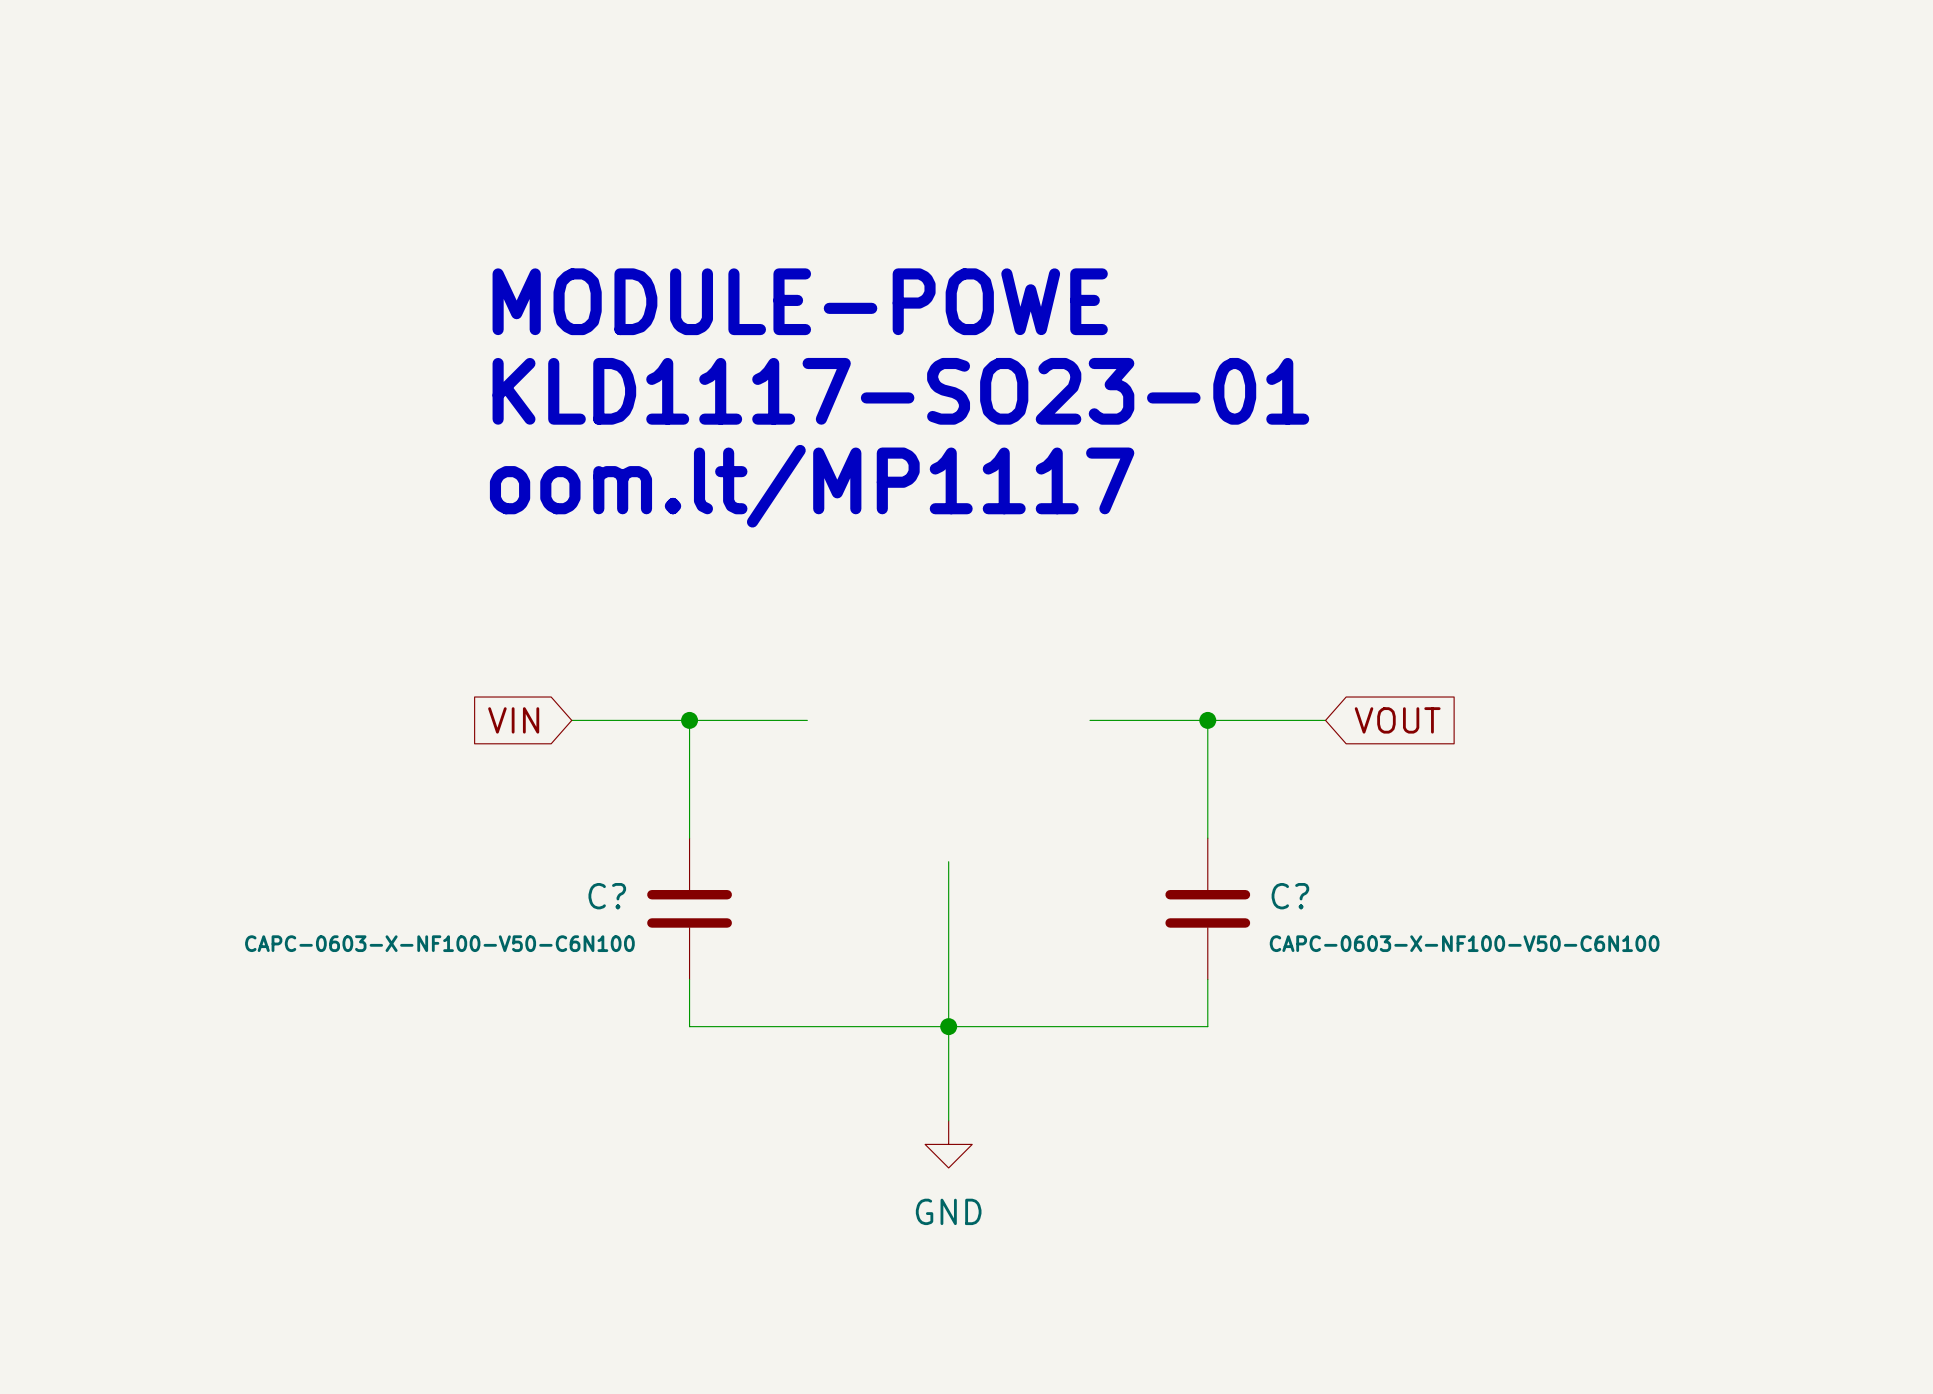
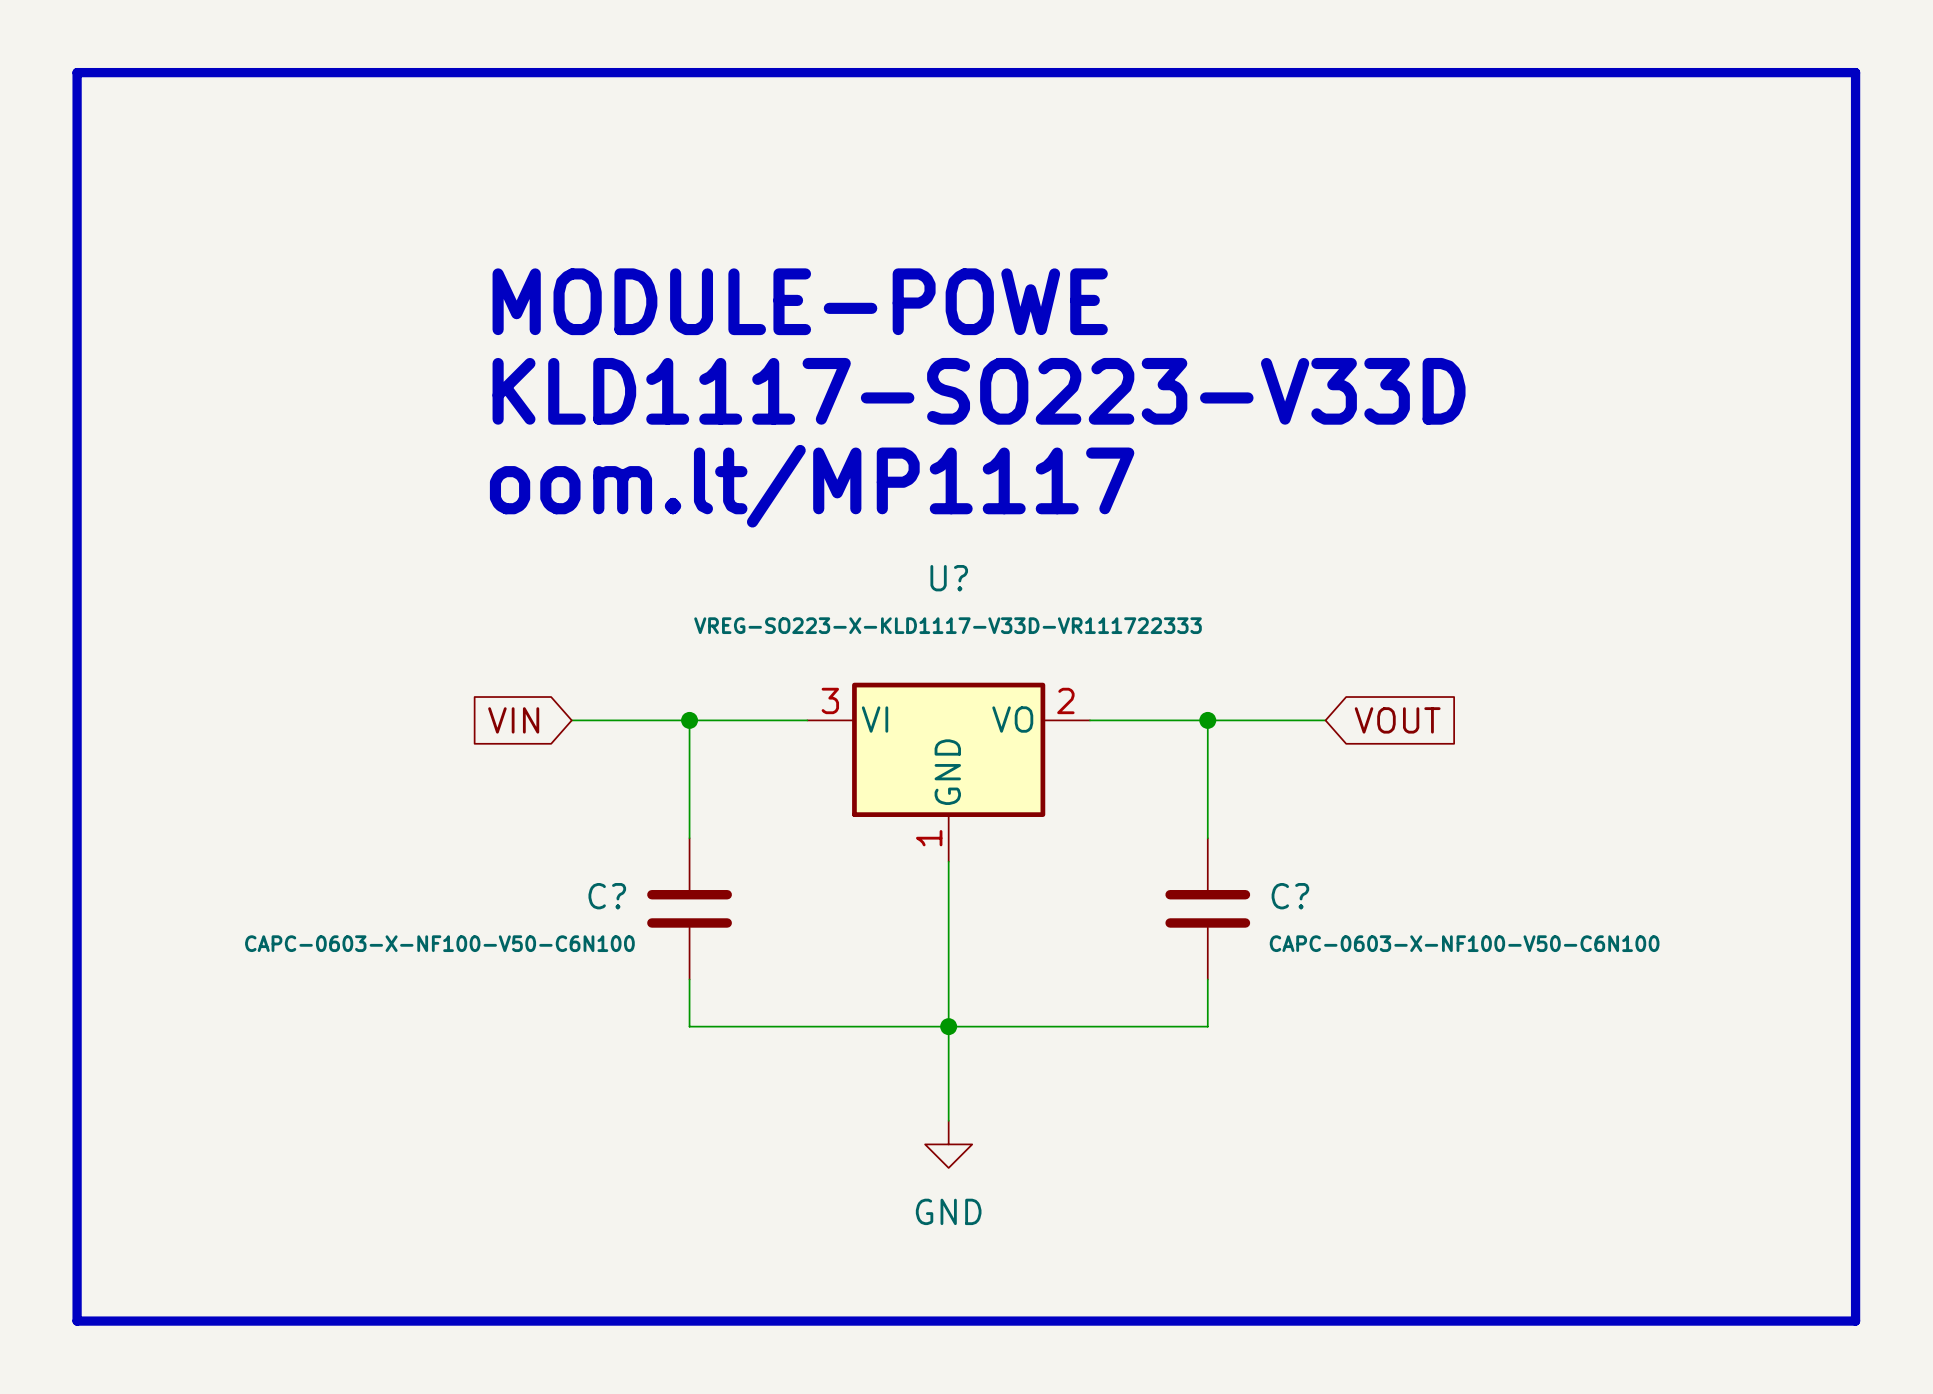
line: none -> (77, 72) (1855, 72) (1855, 1321) (77, 1321) (77, 72)
text: KLD1117-SO23-01 (900, 391) -> KLD1117-SO223-V33D (979, 391)
U?: none -> VREG-SO223-X-KLD1117-V33D-VR111722333 (948, 772)

